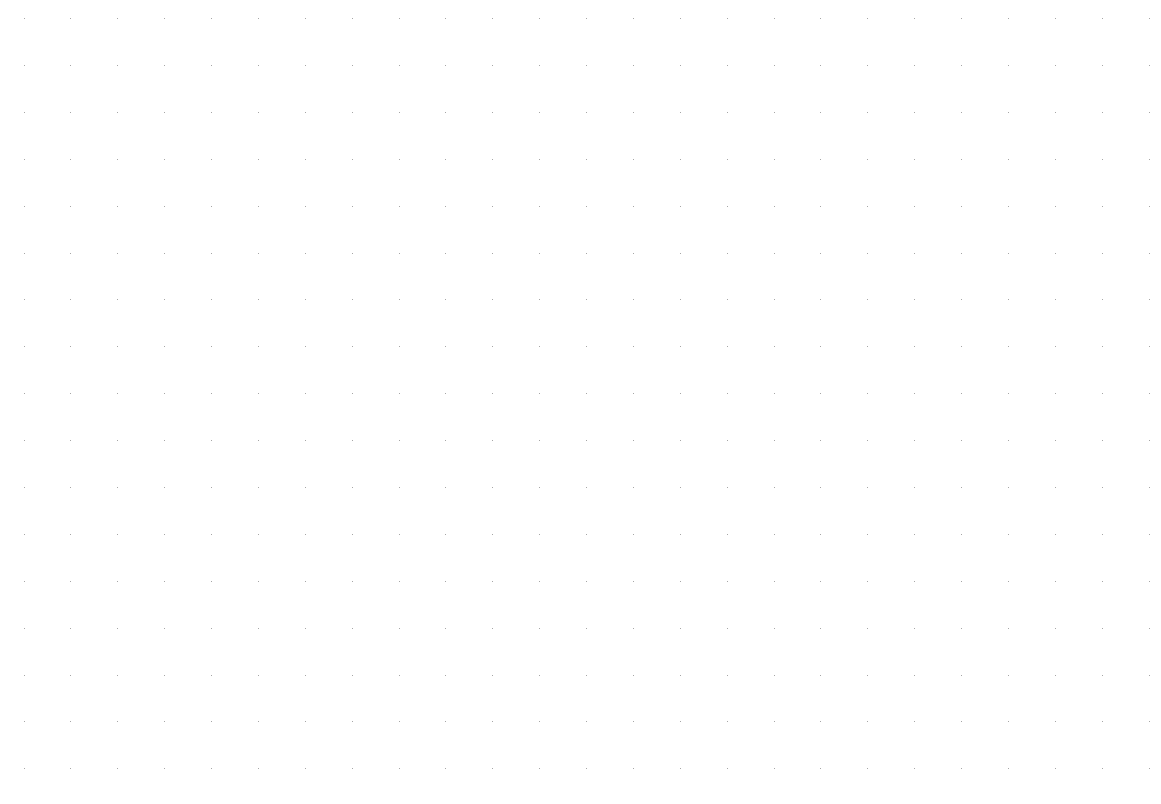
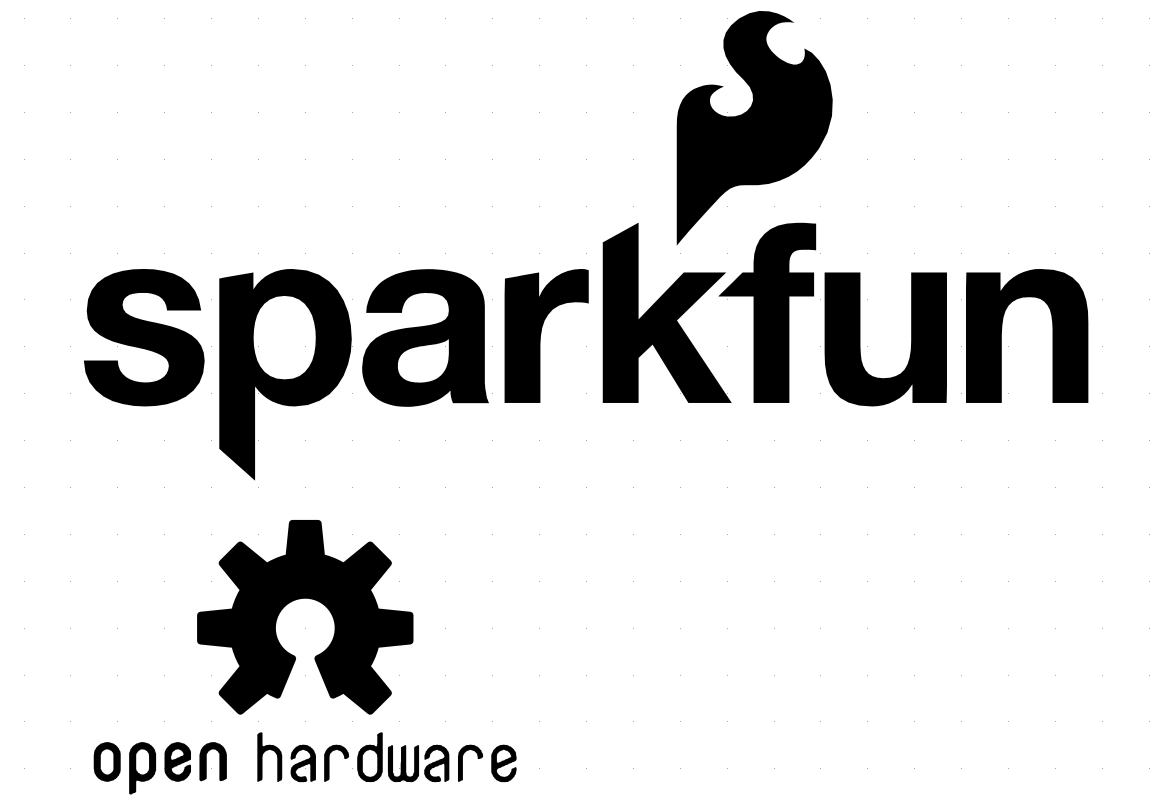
part: none -> (586, 245)
part: none -> (305, 657)

